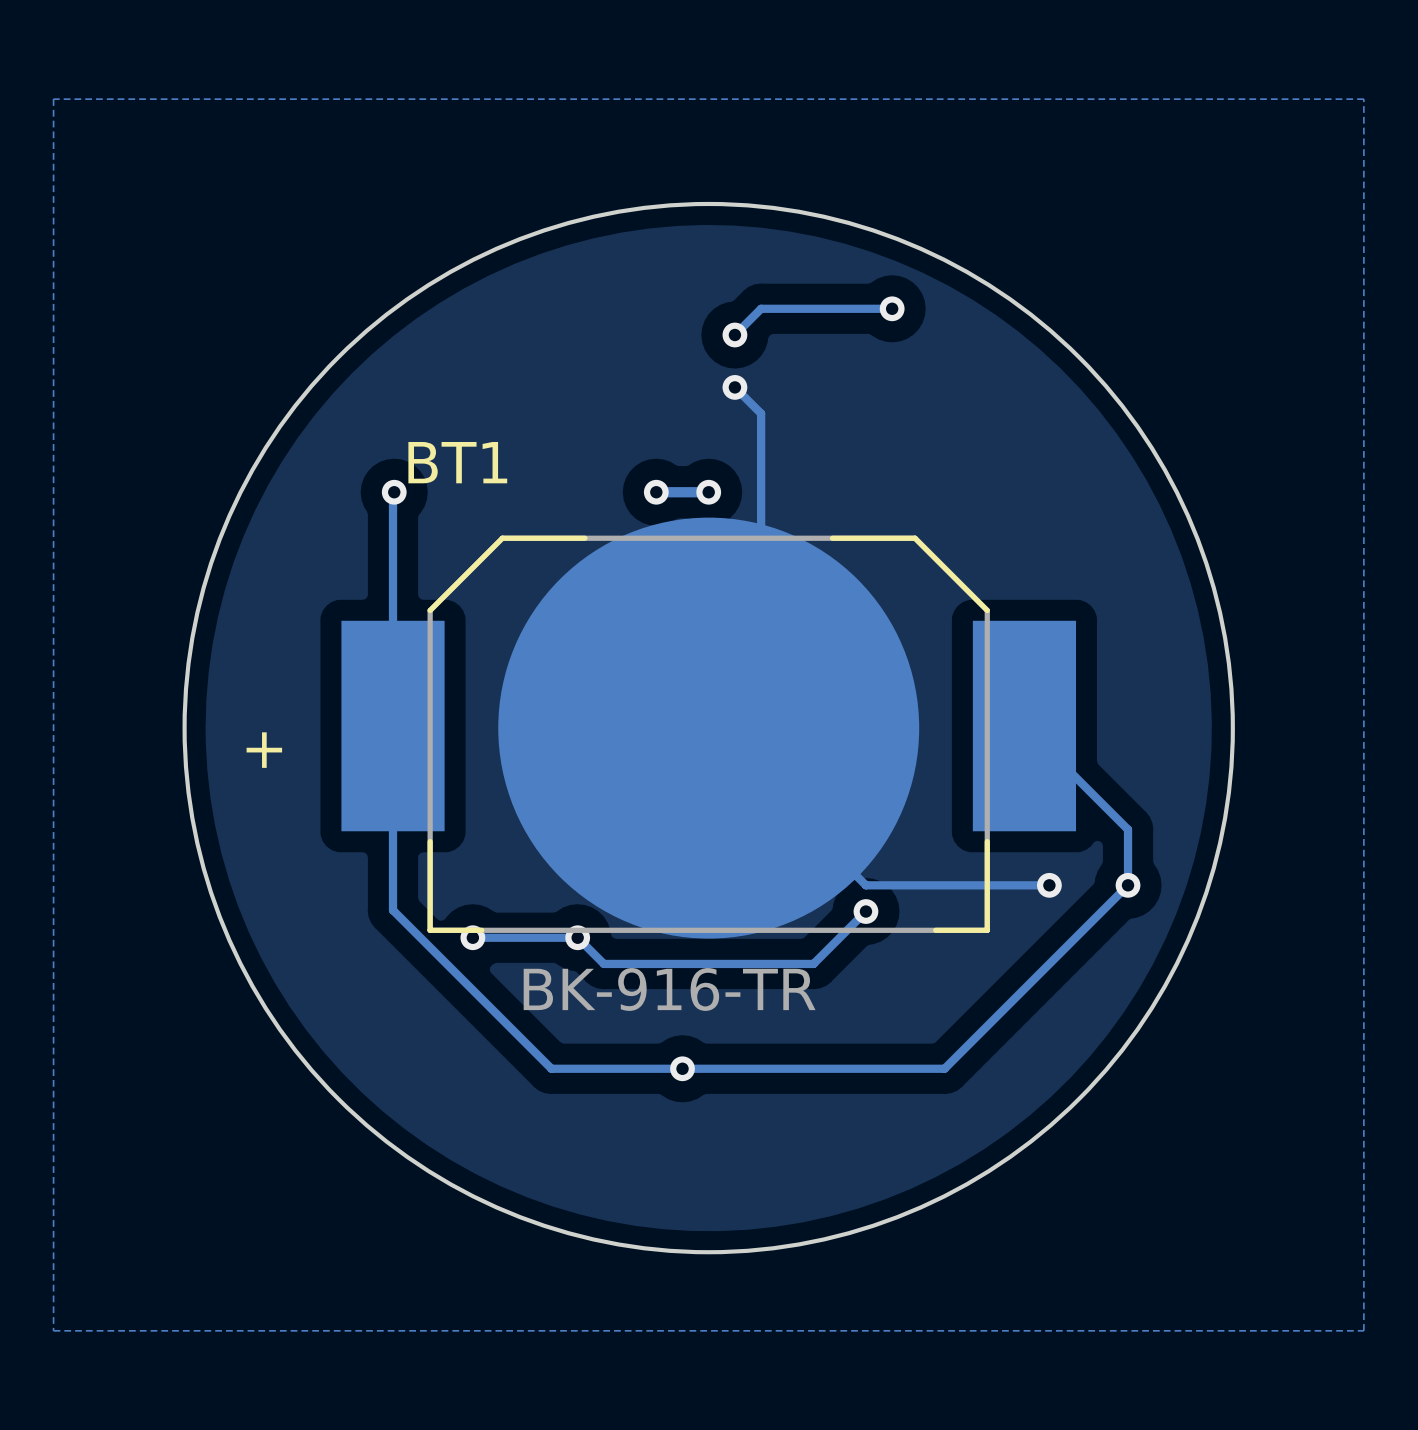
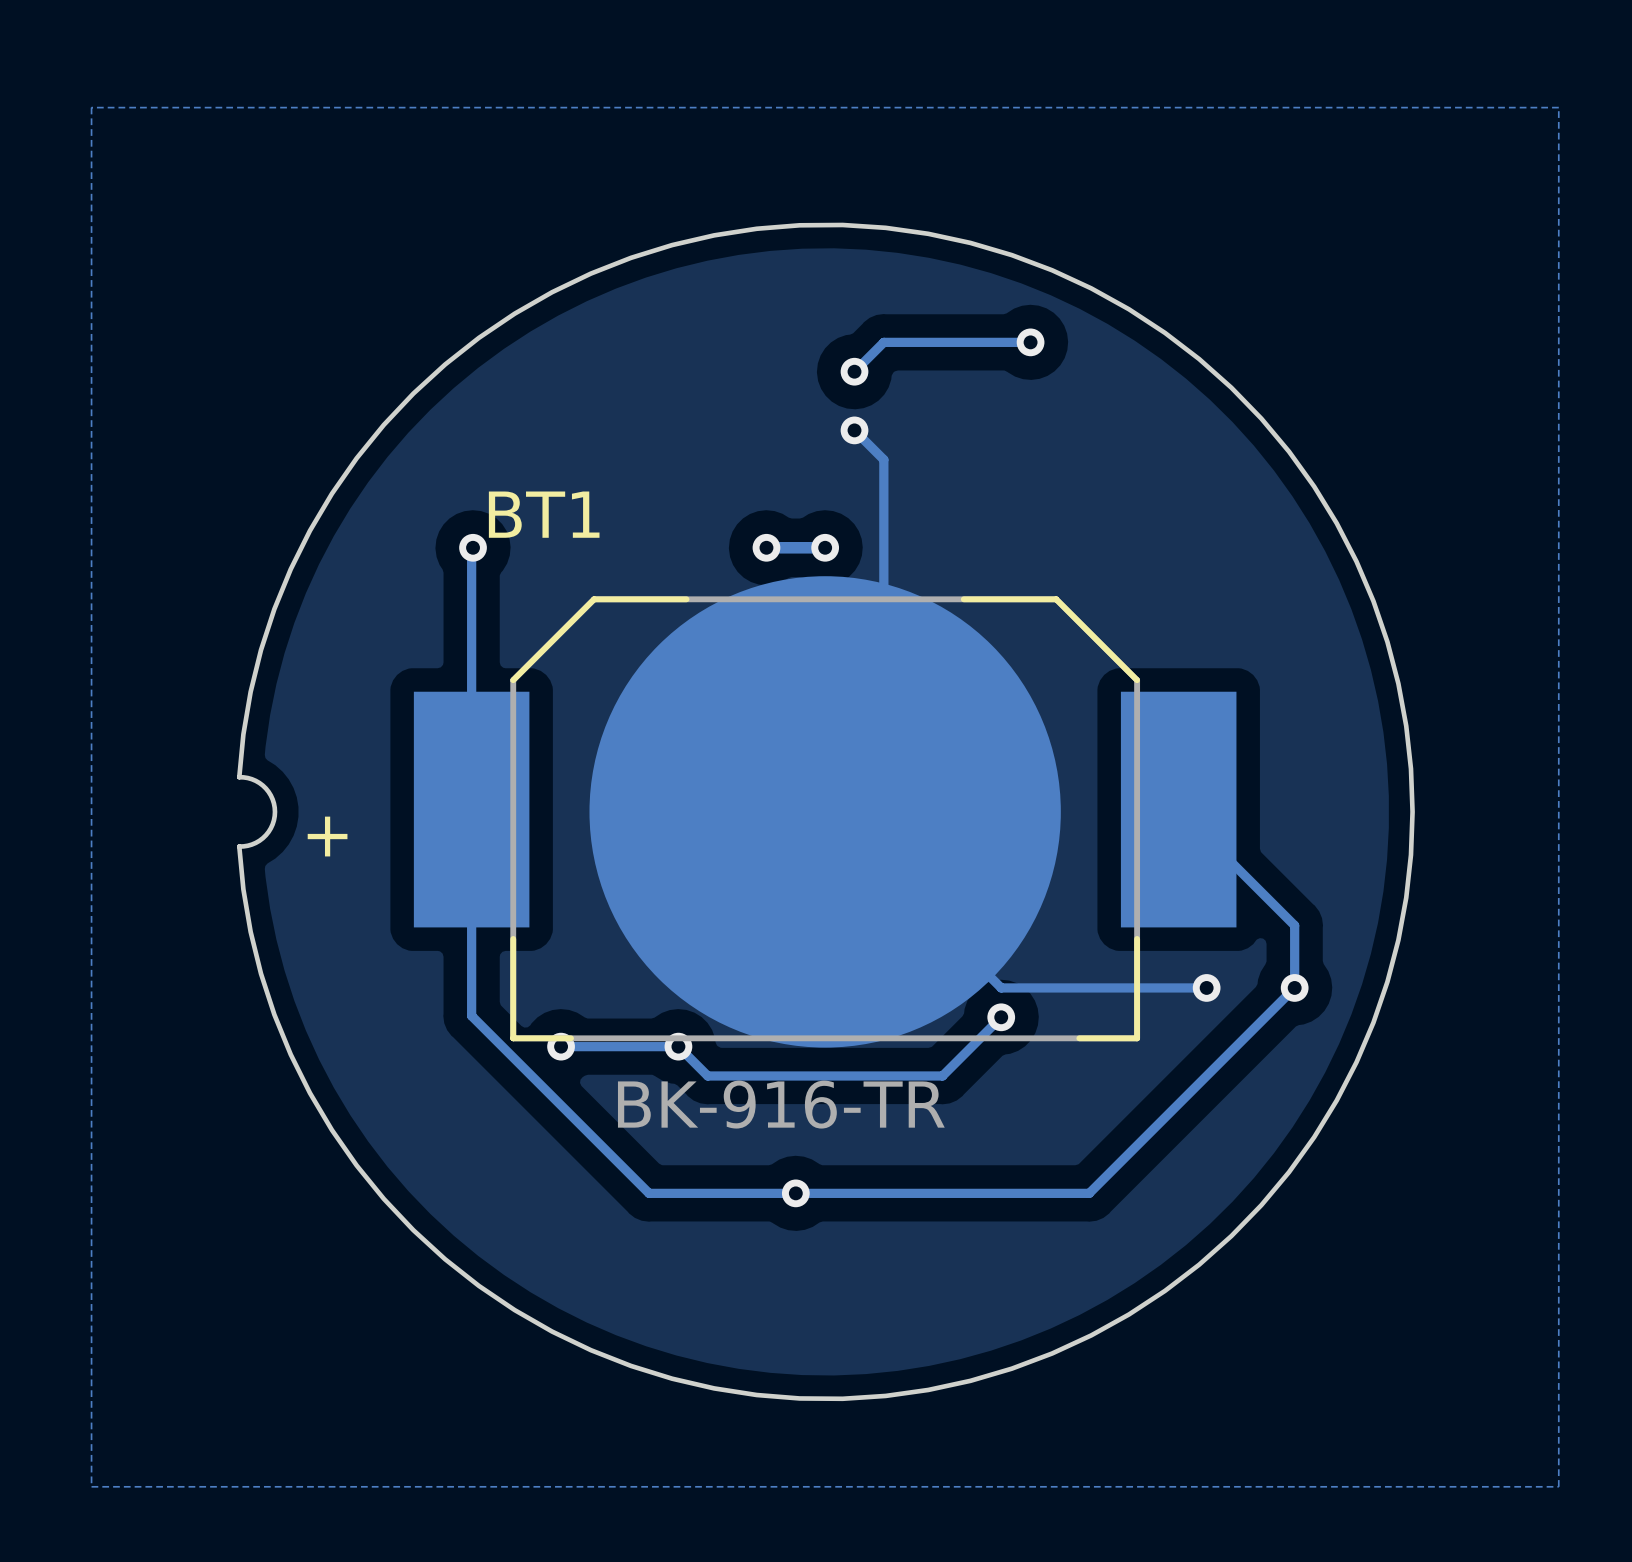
round board edge: [182, 201, 1235, 1255] -> none
board edge: none -> (239, 777) (243, 734) (250, 691) (261, 650) (274, 609) (290, 569) (309, 530) (331, 493) (356, 458) (383, 424) (413, 393) (445, 364) (479, 337) (514, 313) (552, 292) (590, 273) (631, 257) (672, 245) (714, 235) (756, 228) (799, 225) (842, 224) (885, 227) (928, 233) (970, 242) (1011, 255) (1052, 270) (1091, 288) (1128, 309) (1164, 332) (1199, 359) (1231, 387) (1261, 418) (1289, 451) (1314, 486) (1336, 523) (1356, 561) (1373, 601) (1387, 641) (1398, 683) (1406, 726) (1410, 768) (1412, 811) (1410, 854) (1406, 897) (1398, 940) (1387, 981) (1373, 1022) (1356, 1062) (1336, 1100) (1314, 1137) (1289, 1172) (1261, 1205) (1231, 1236) (1199, 1264) (1164, 1290) (1128, 1314) (1091, 1335) (1052, 1353) (1011, 1368) (970, 1380) (928, 1389) (885, 1395) (842, 1398) (799, 1398) (756, 1395) (714, 1388) (672, 1378) (631, 1365) (590, 1350) (552, 1331) (514, 1310) (479, 1285) (445, 1259) (413, 1230) (383, 1198) (356, 1165) (331, 1130) (309, 1093) (290, 1054) (274, 1014) (261, 973) (250, 931) (243, 889) (239, 846) (255, 842) (265, 835) (273, 820) (274, 807) (270, 795) (262, 785) (251, 779) (239, 777)

